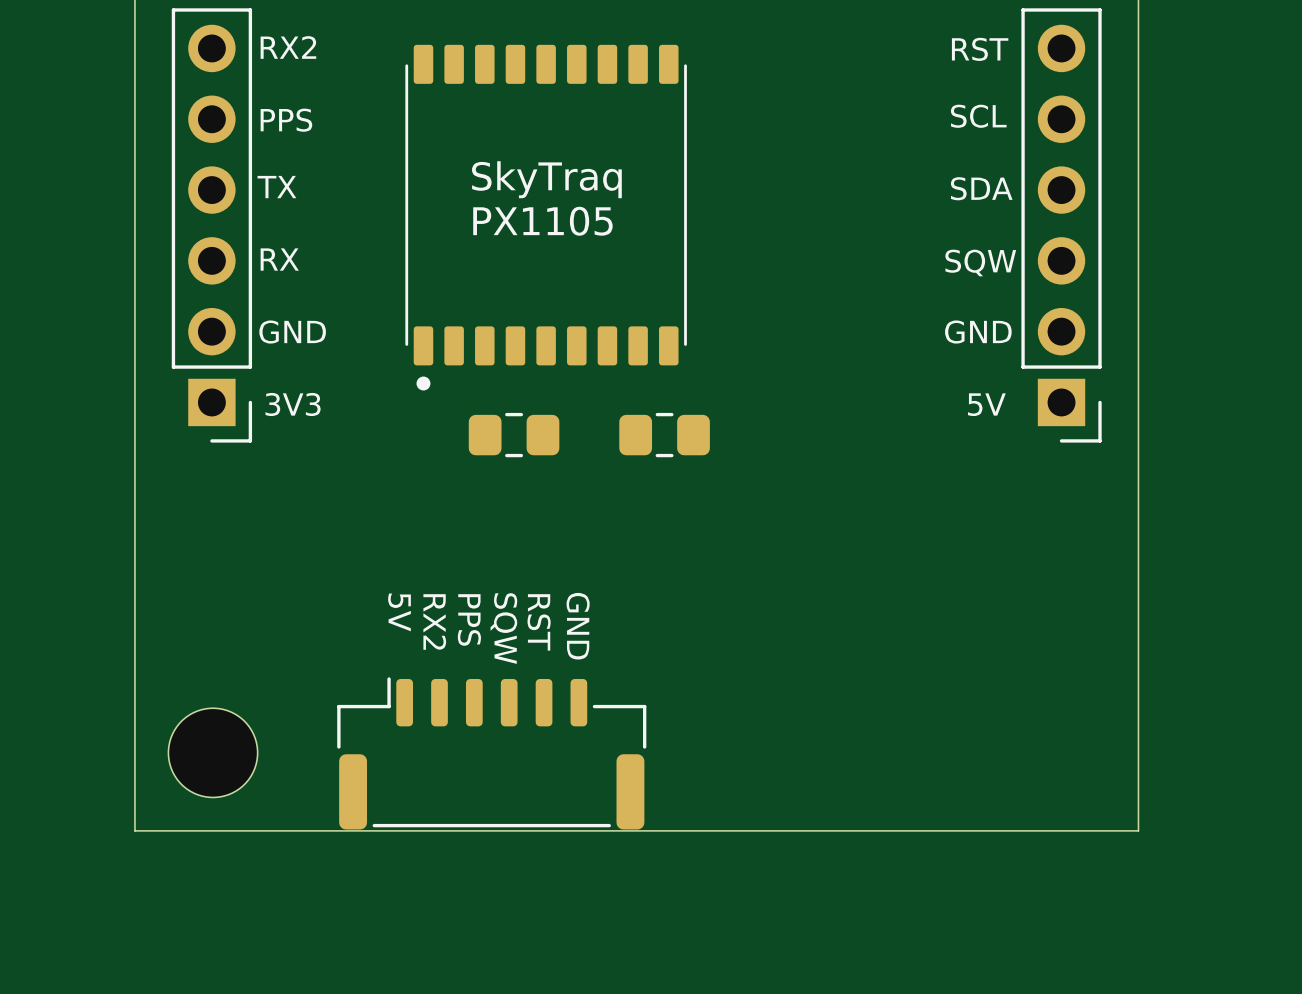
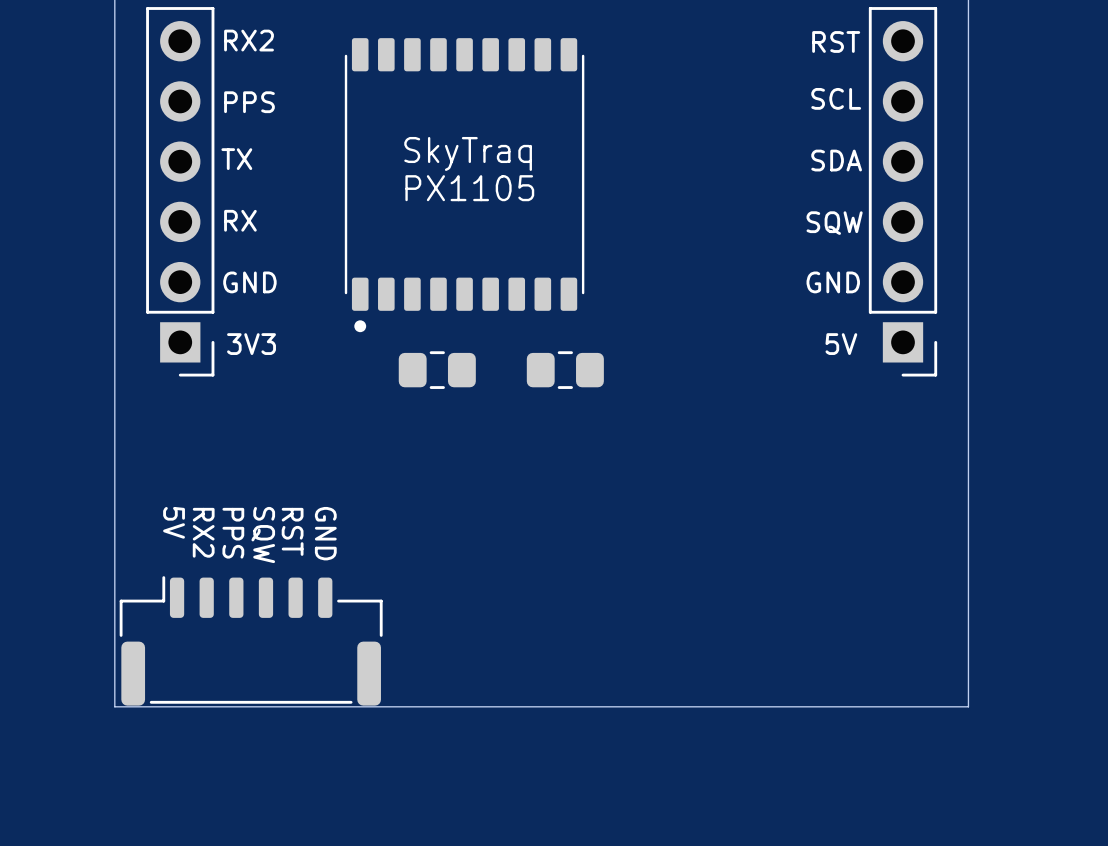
text: none -> 5V (174, 522)
text: 5V (399, 612) -> GND (325, 533)
text position: PPS (469, 619) -> PPS (233, 533)
text position: RX2 (434, 621) -> RX2 (203, 532)
text position: RST (539, 622) -> RST (292, 531)
text: GND (578, 626) -> none
text position: SQW (503, 628) -> SQW (263, 535)
part: (213, 752) -> none
part position: (491, 753) -> (251, 640)

